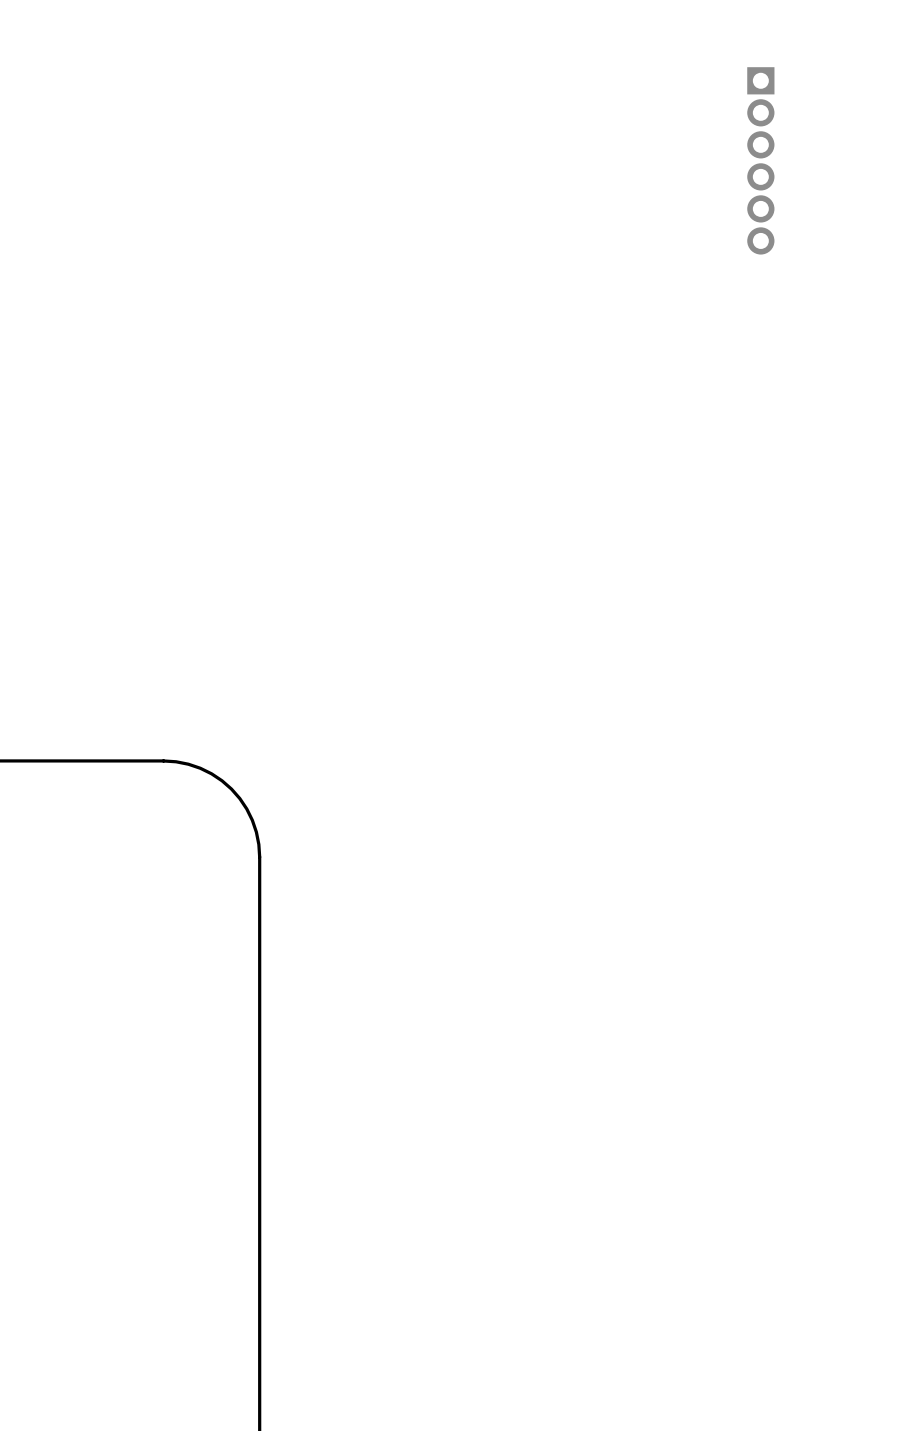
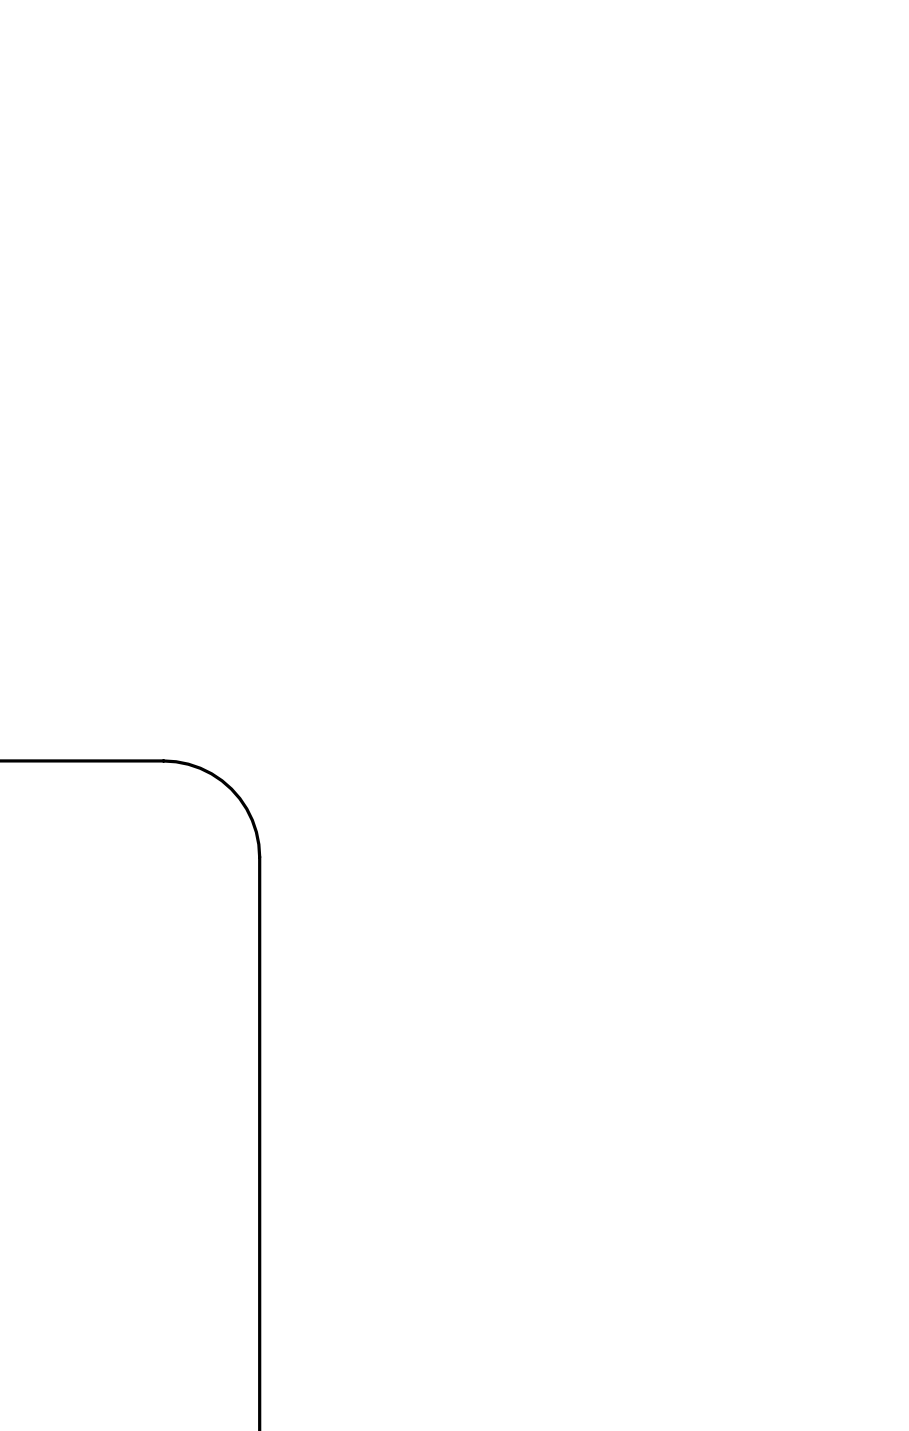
part: (760, 160) -> none

